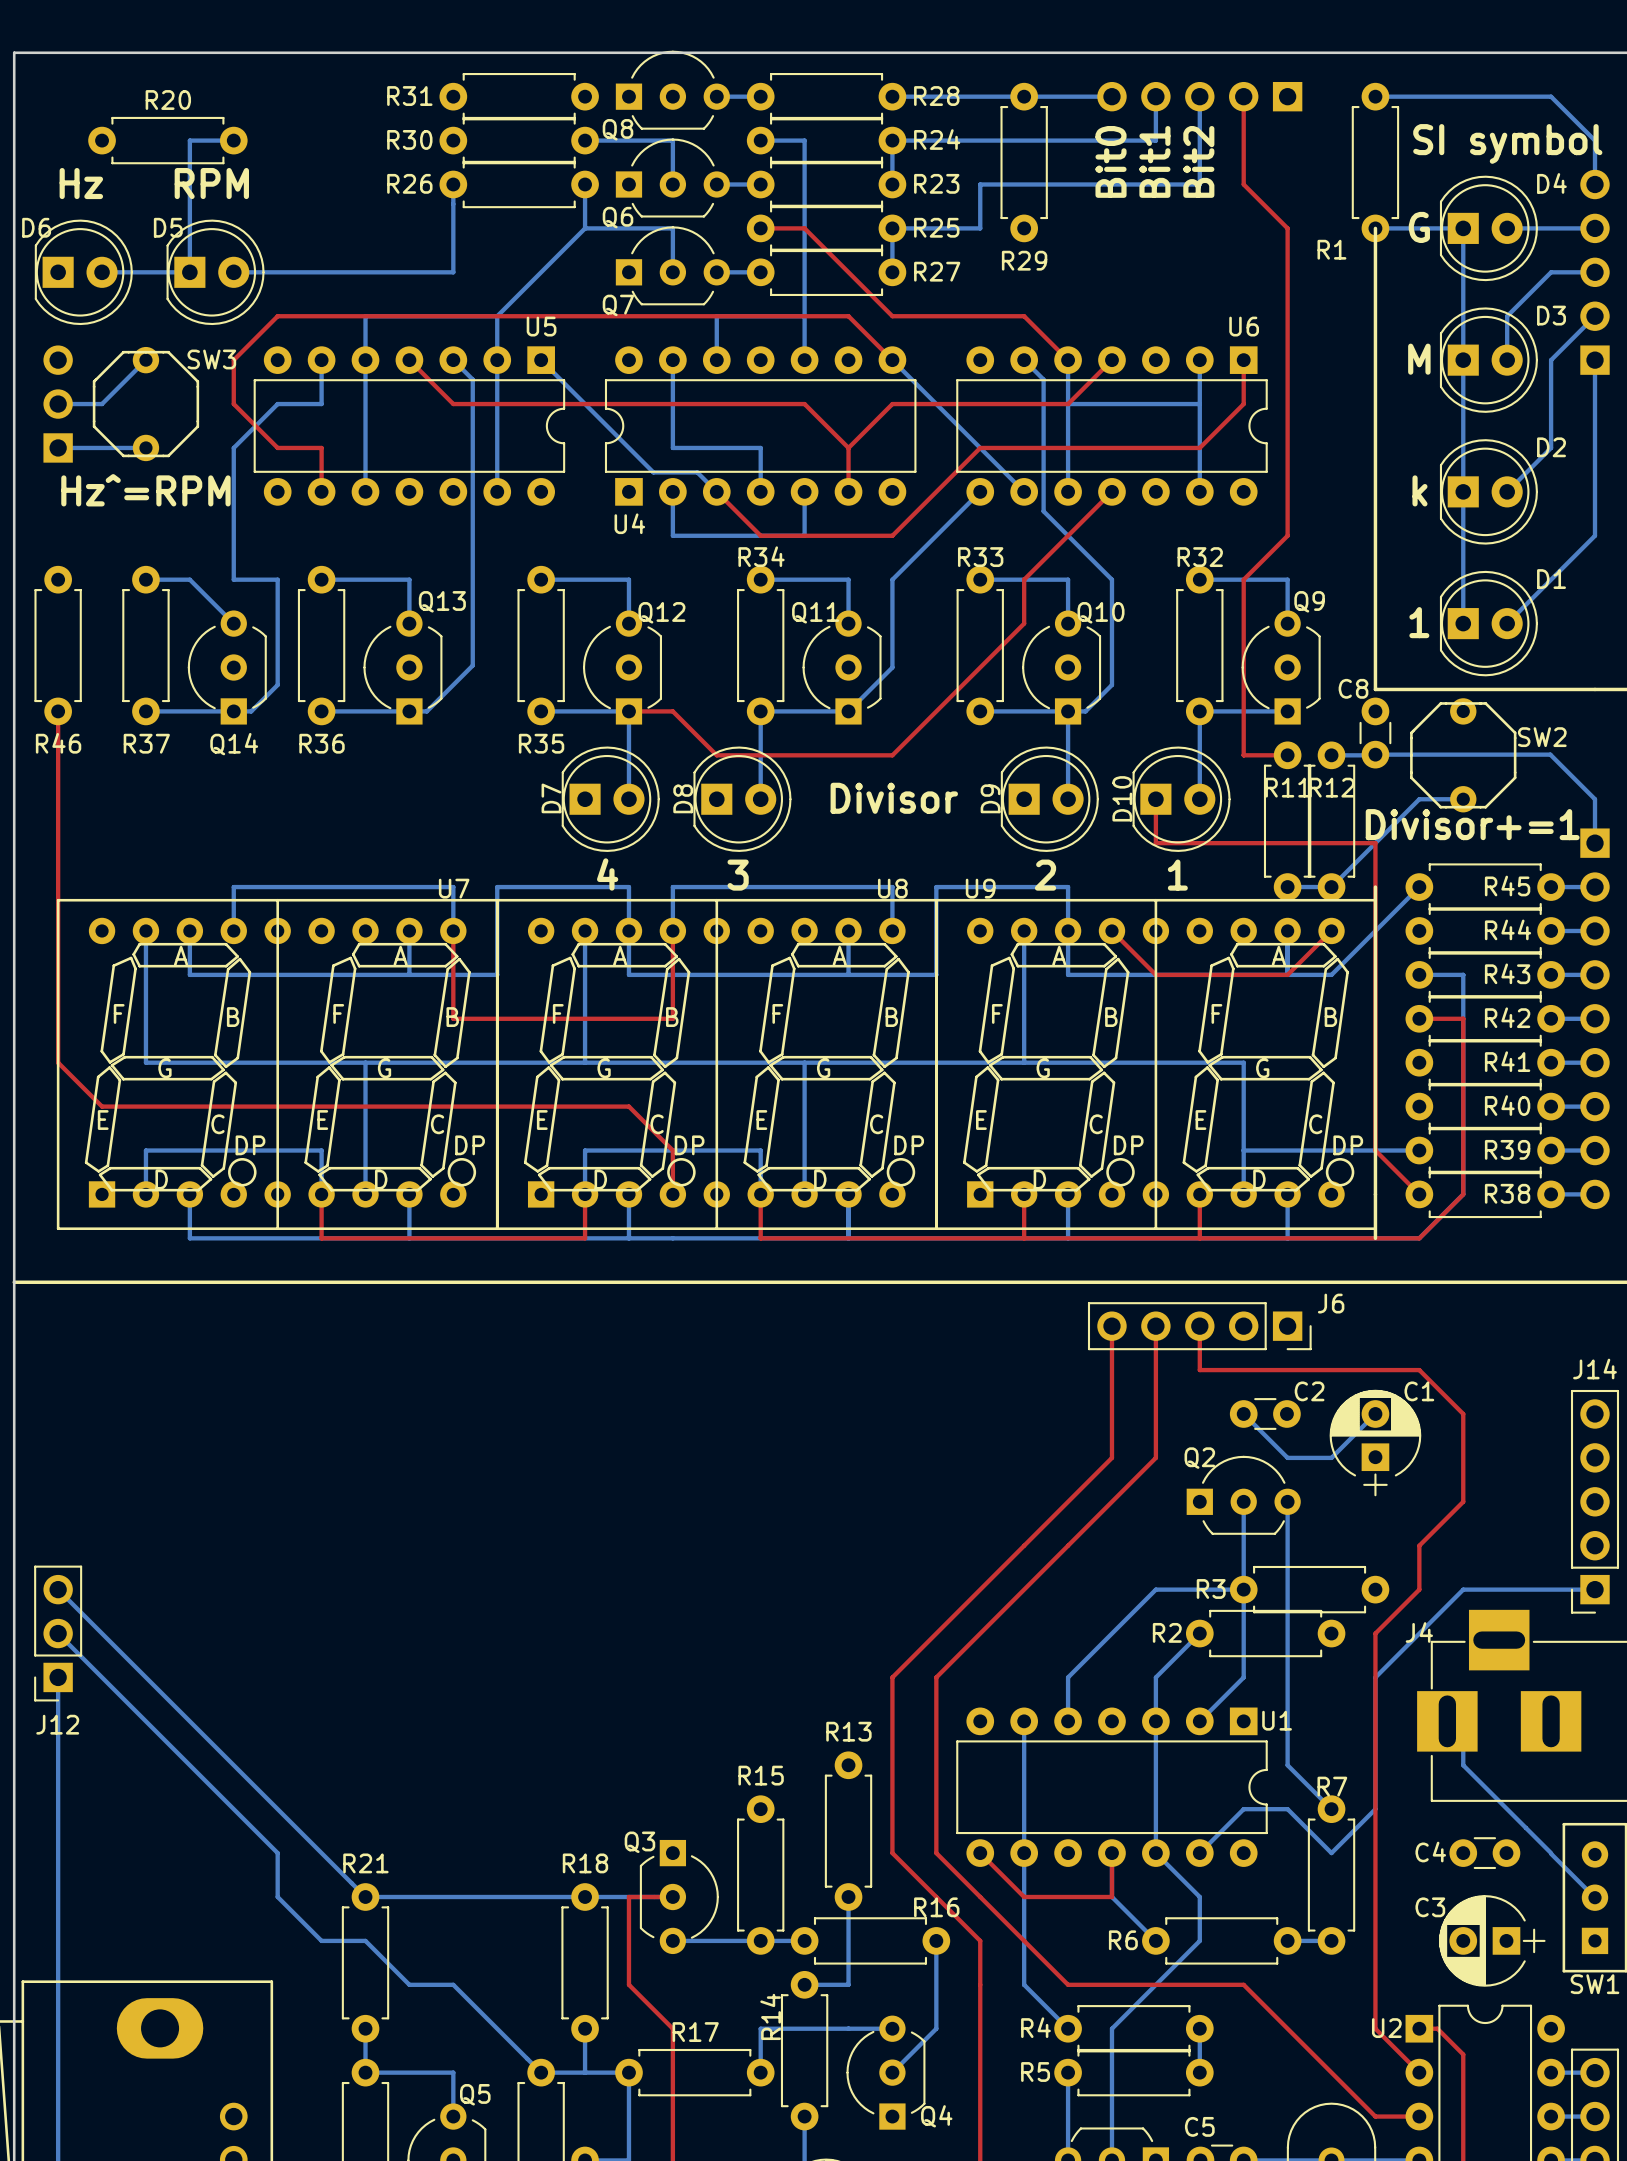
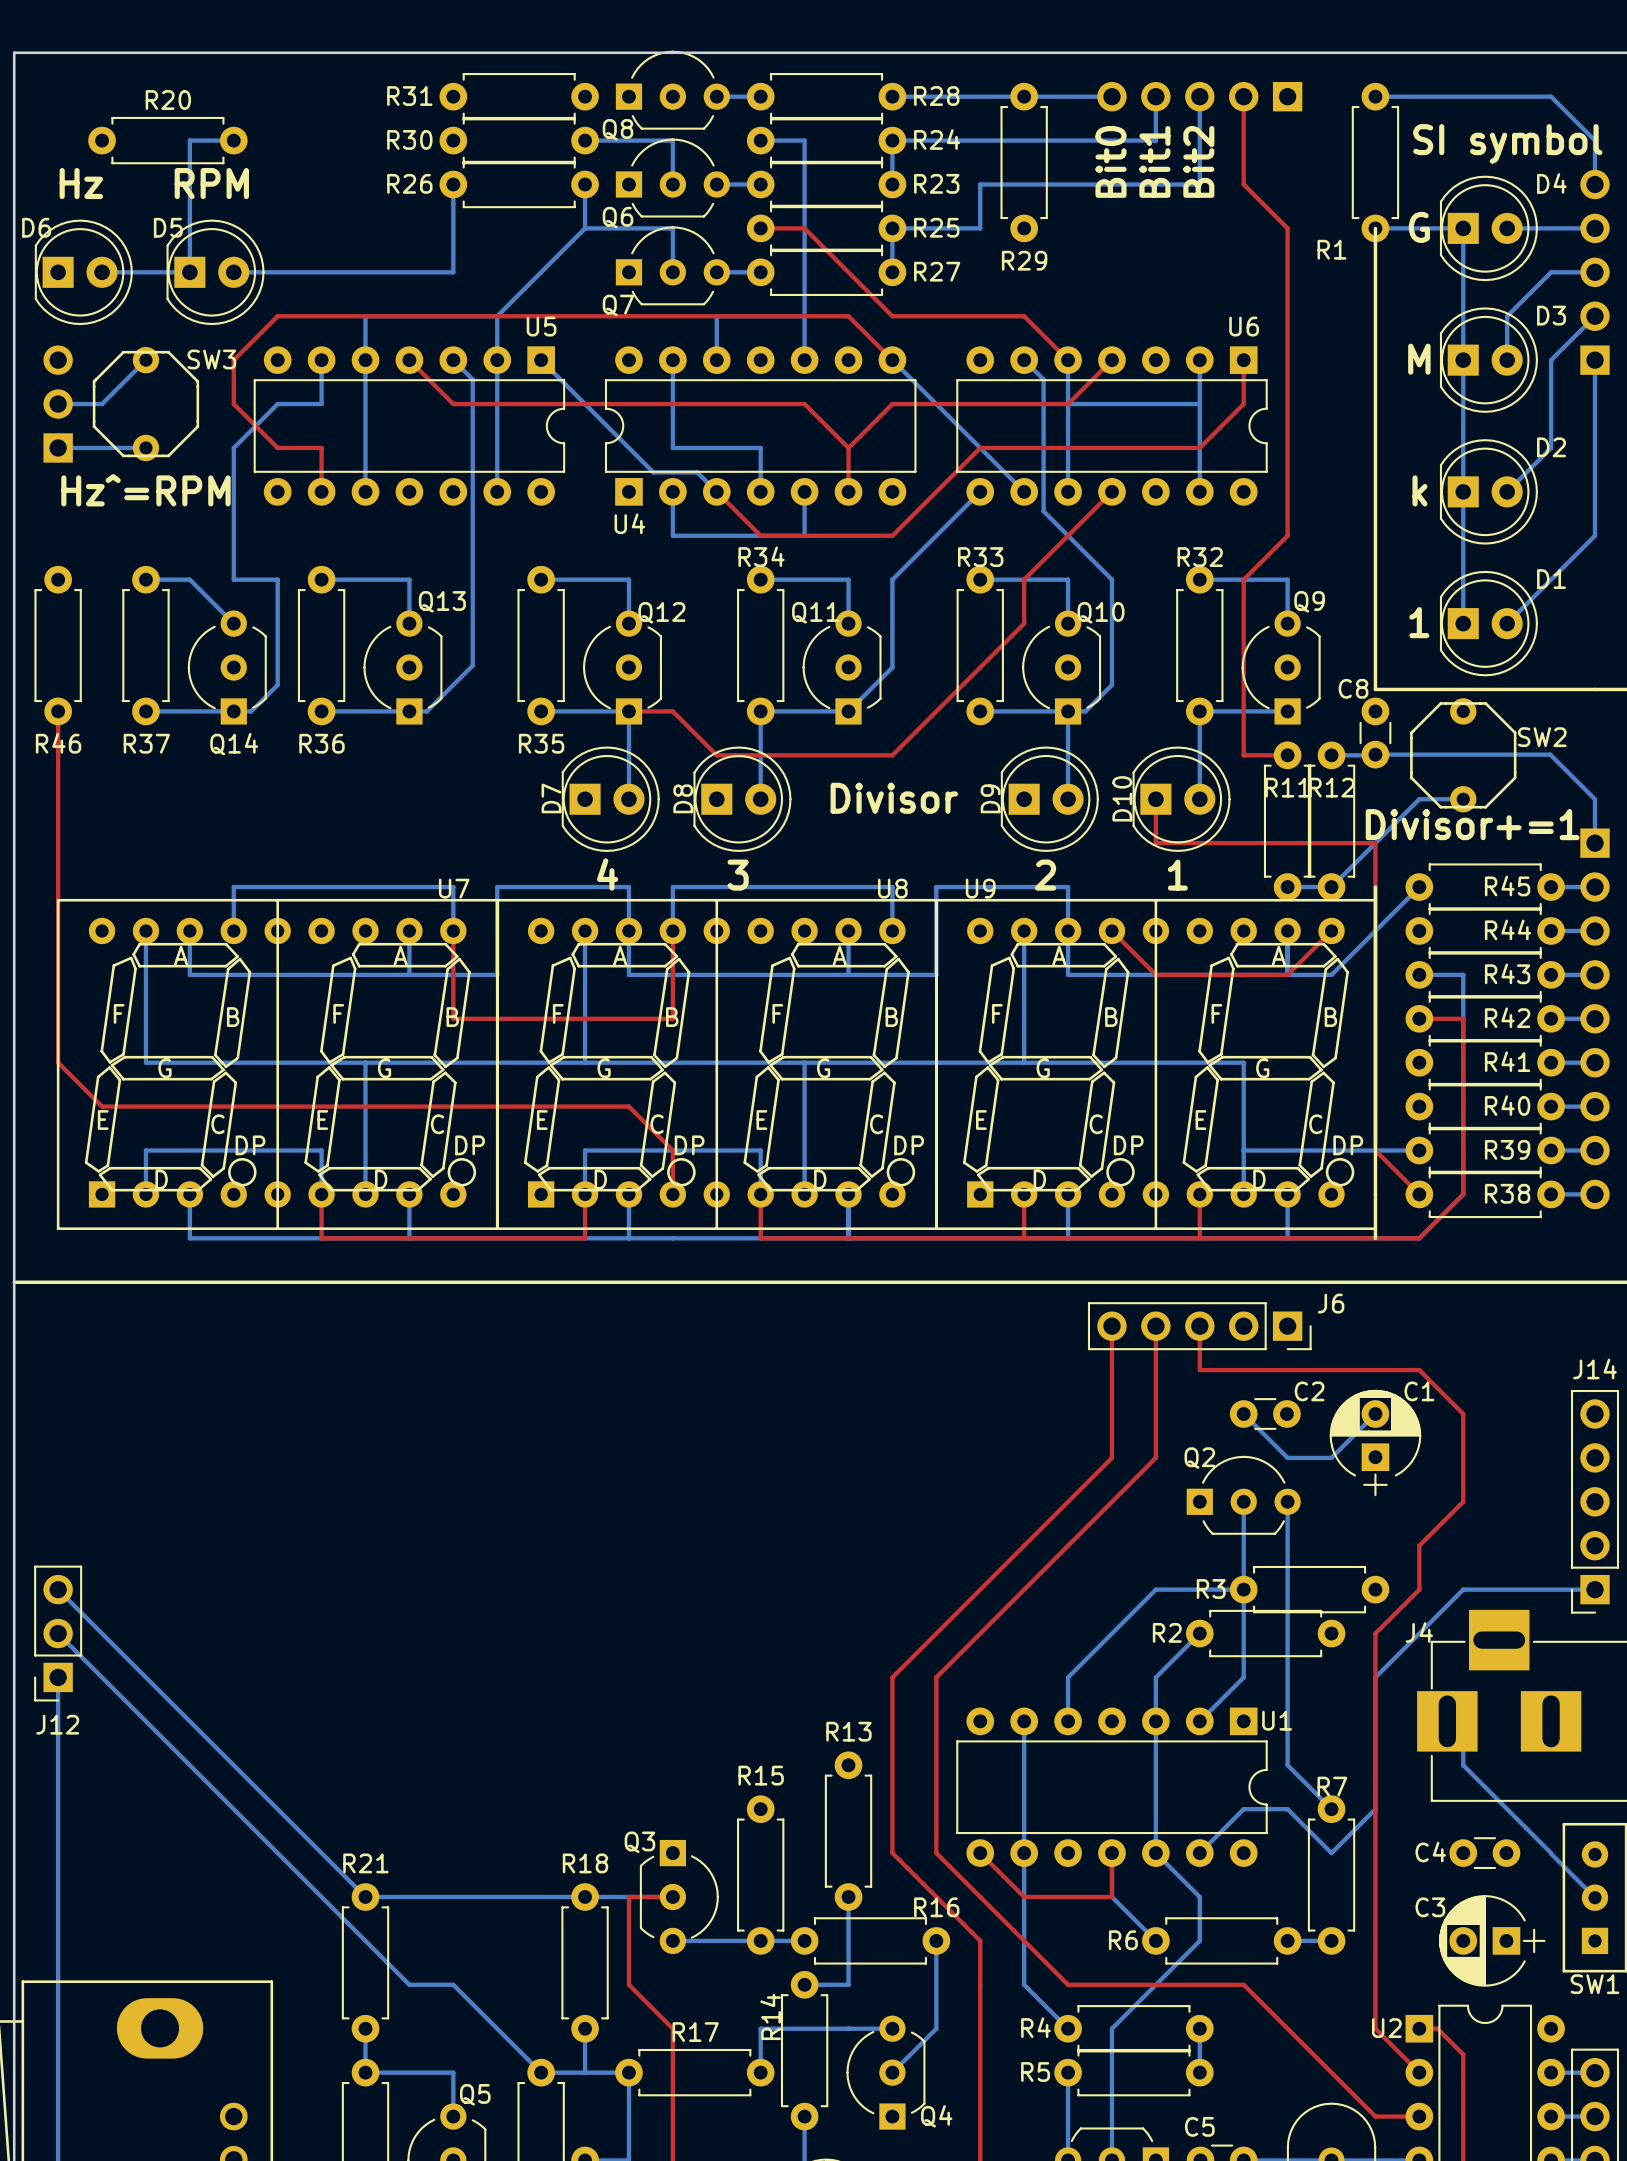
bottom track: (277, 1853) (277, 1897) (321, 1940) (365, 1940) -> (277, 1853) (365, 1940)

